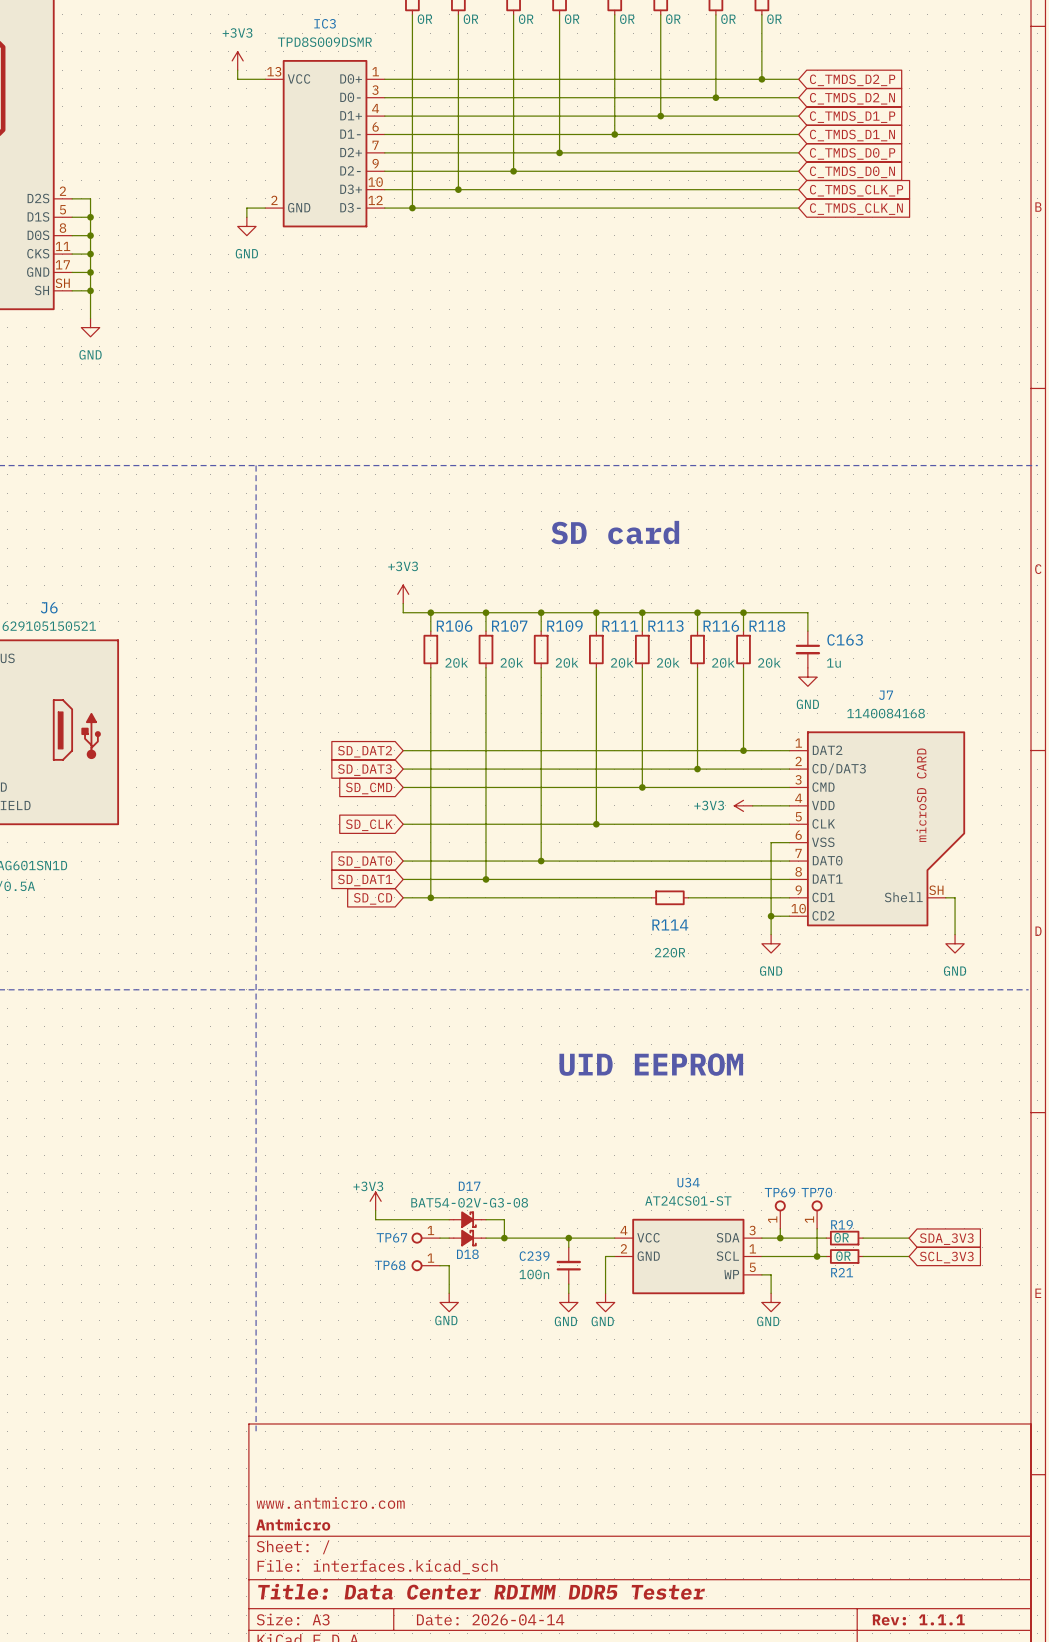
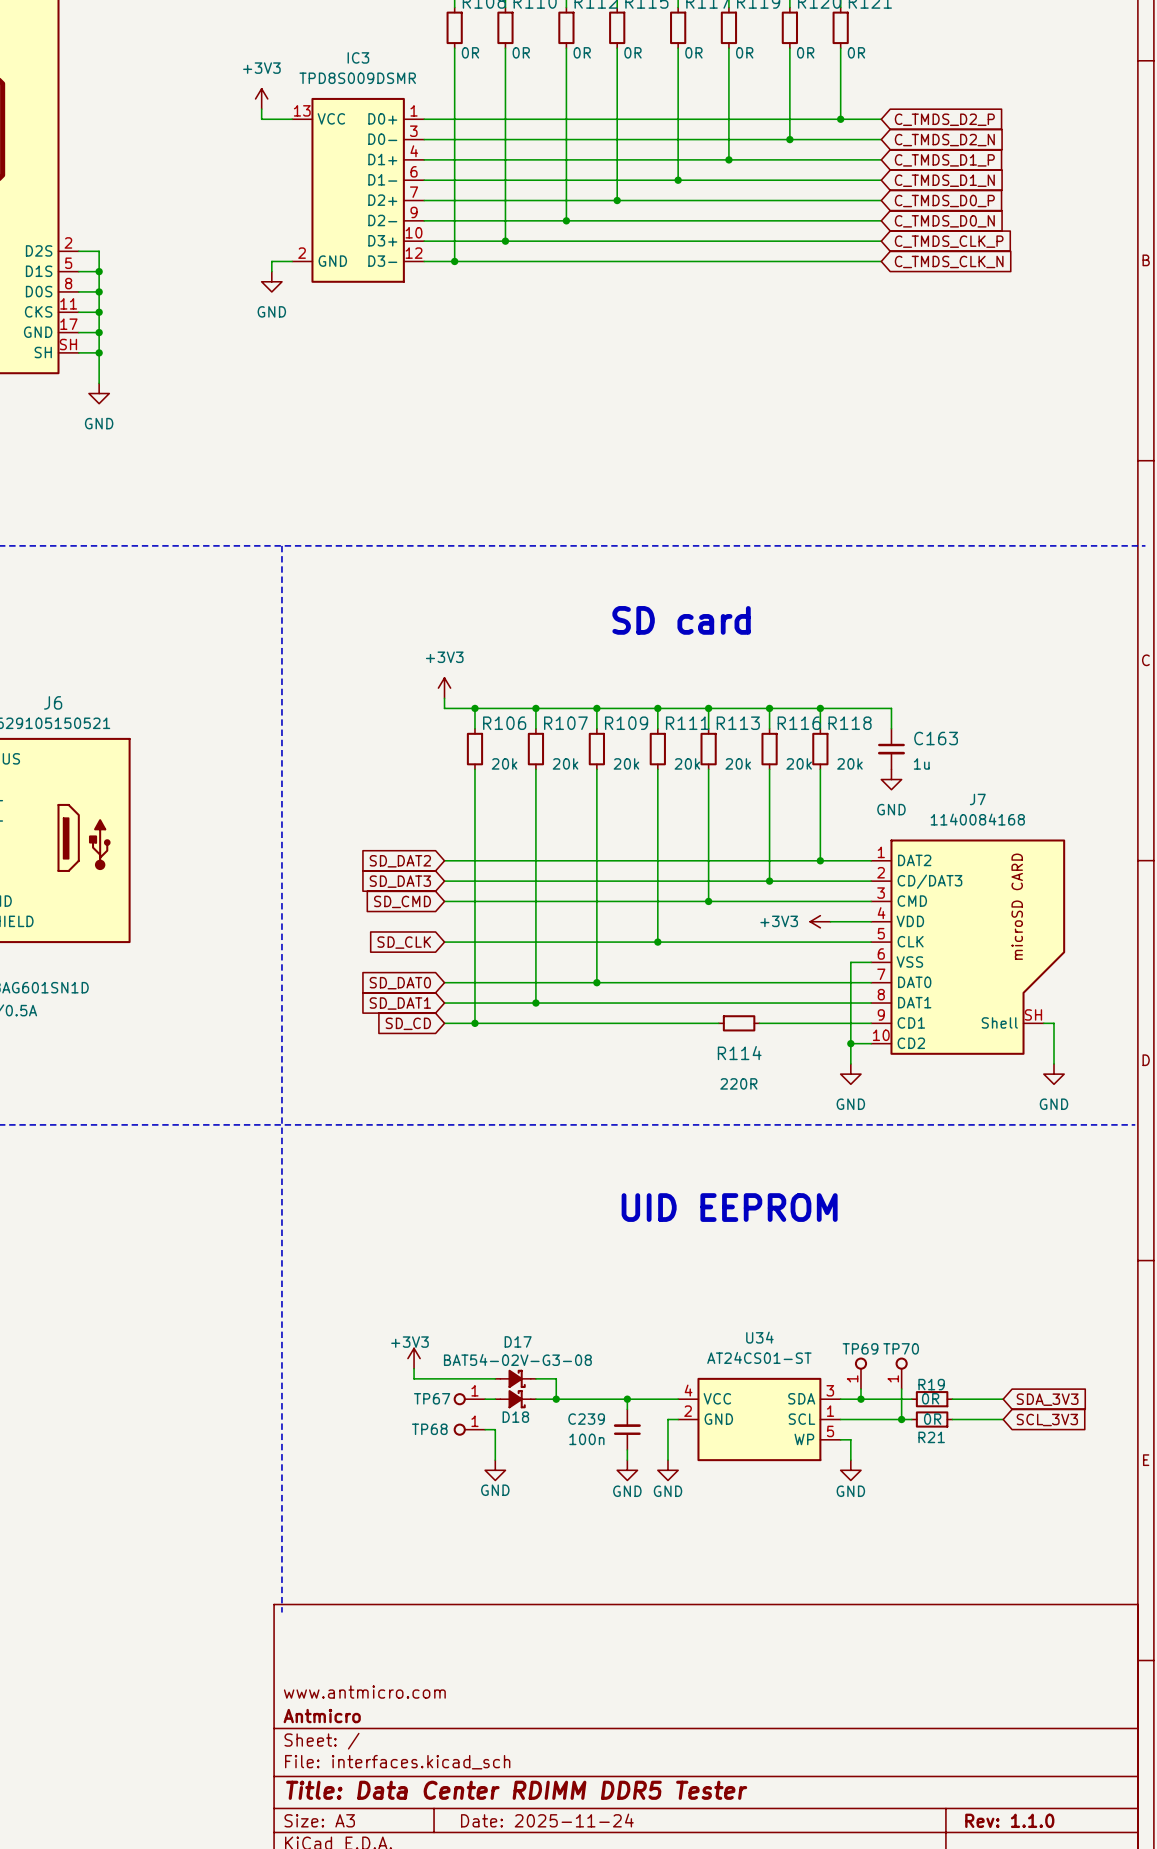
title block: Date: 2026-04-14 (490, 1619) -> Date: 2025-11-24 (547, 1820)
title block: Rev: 1.1.1 (918, 1619) -> Rev: 1.1.0 (1009, 1820)

